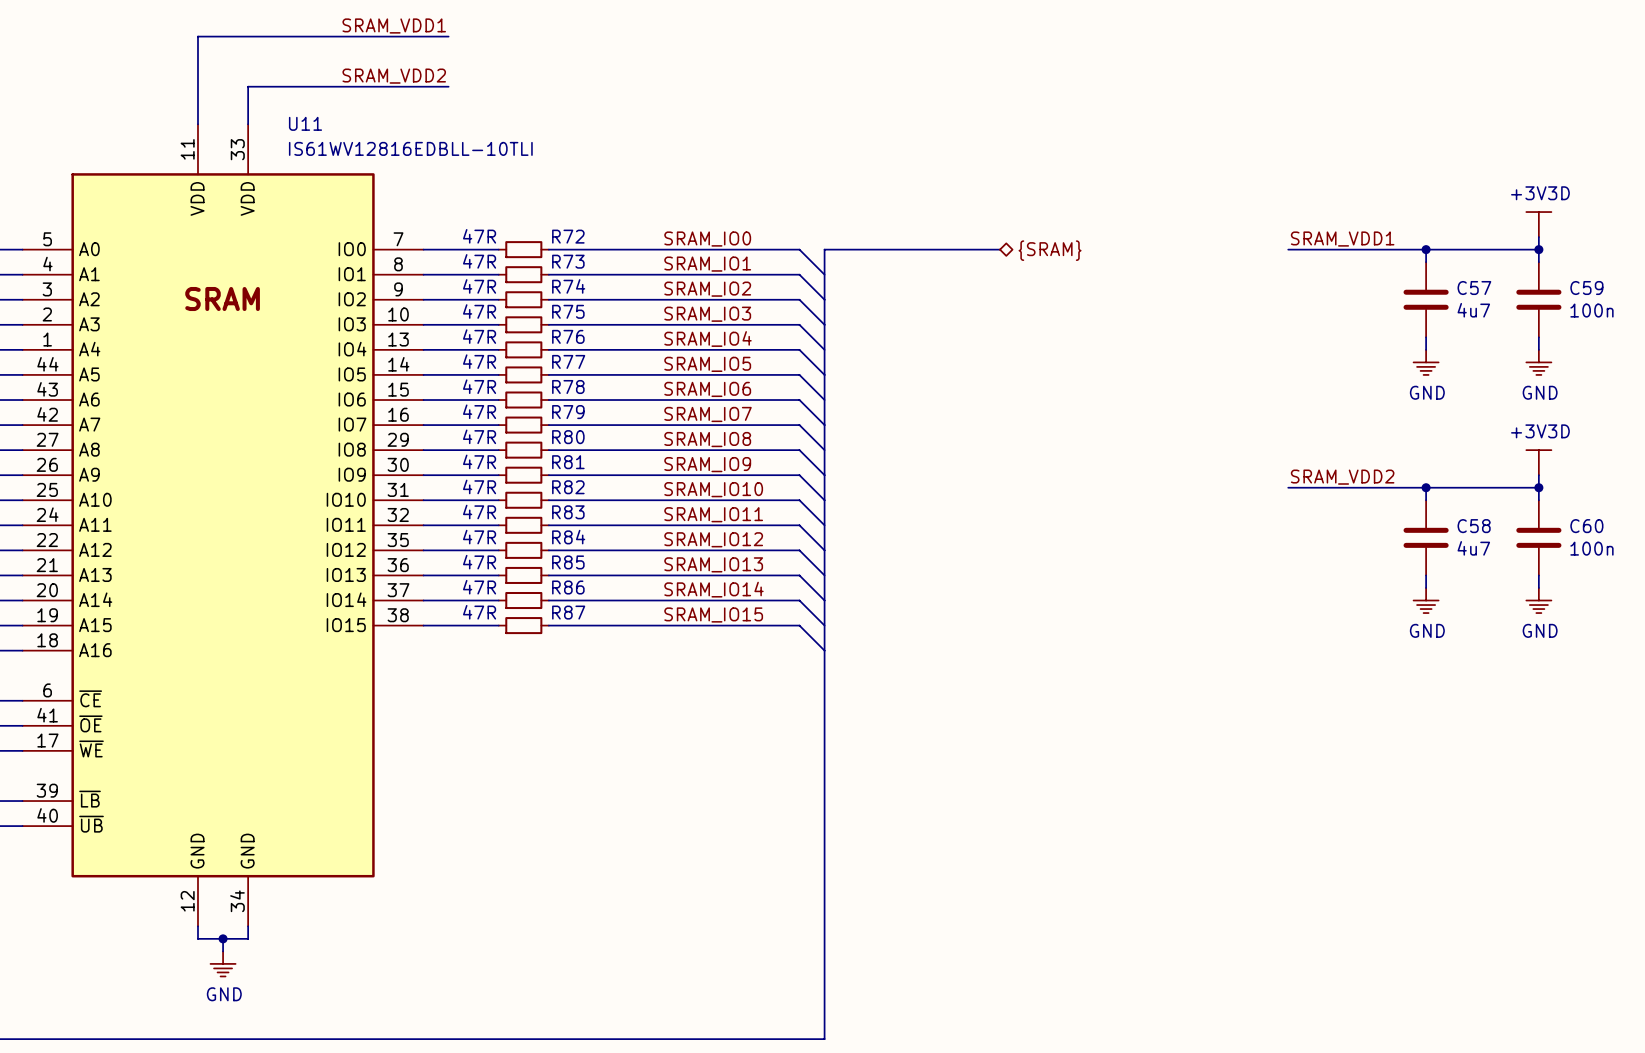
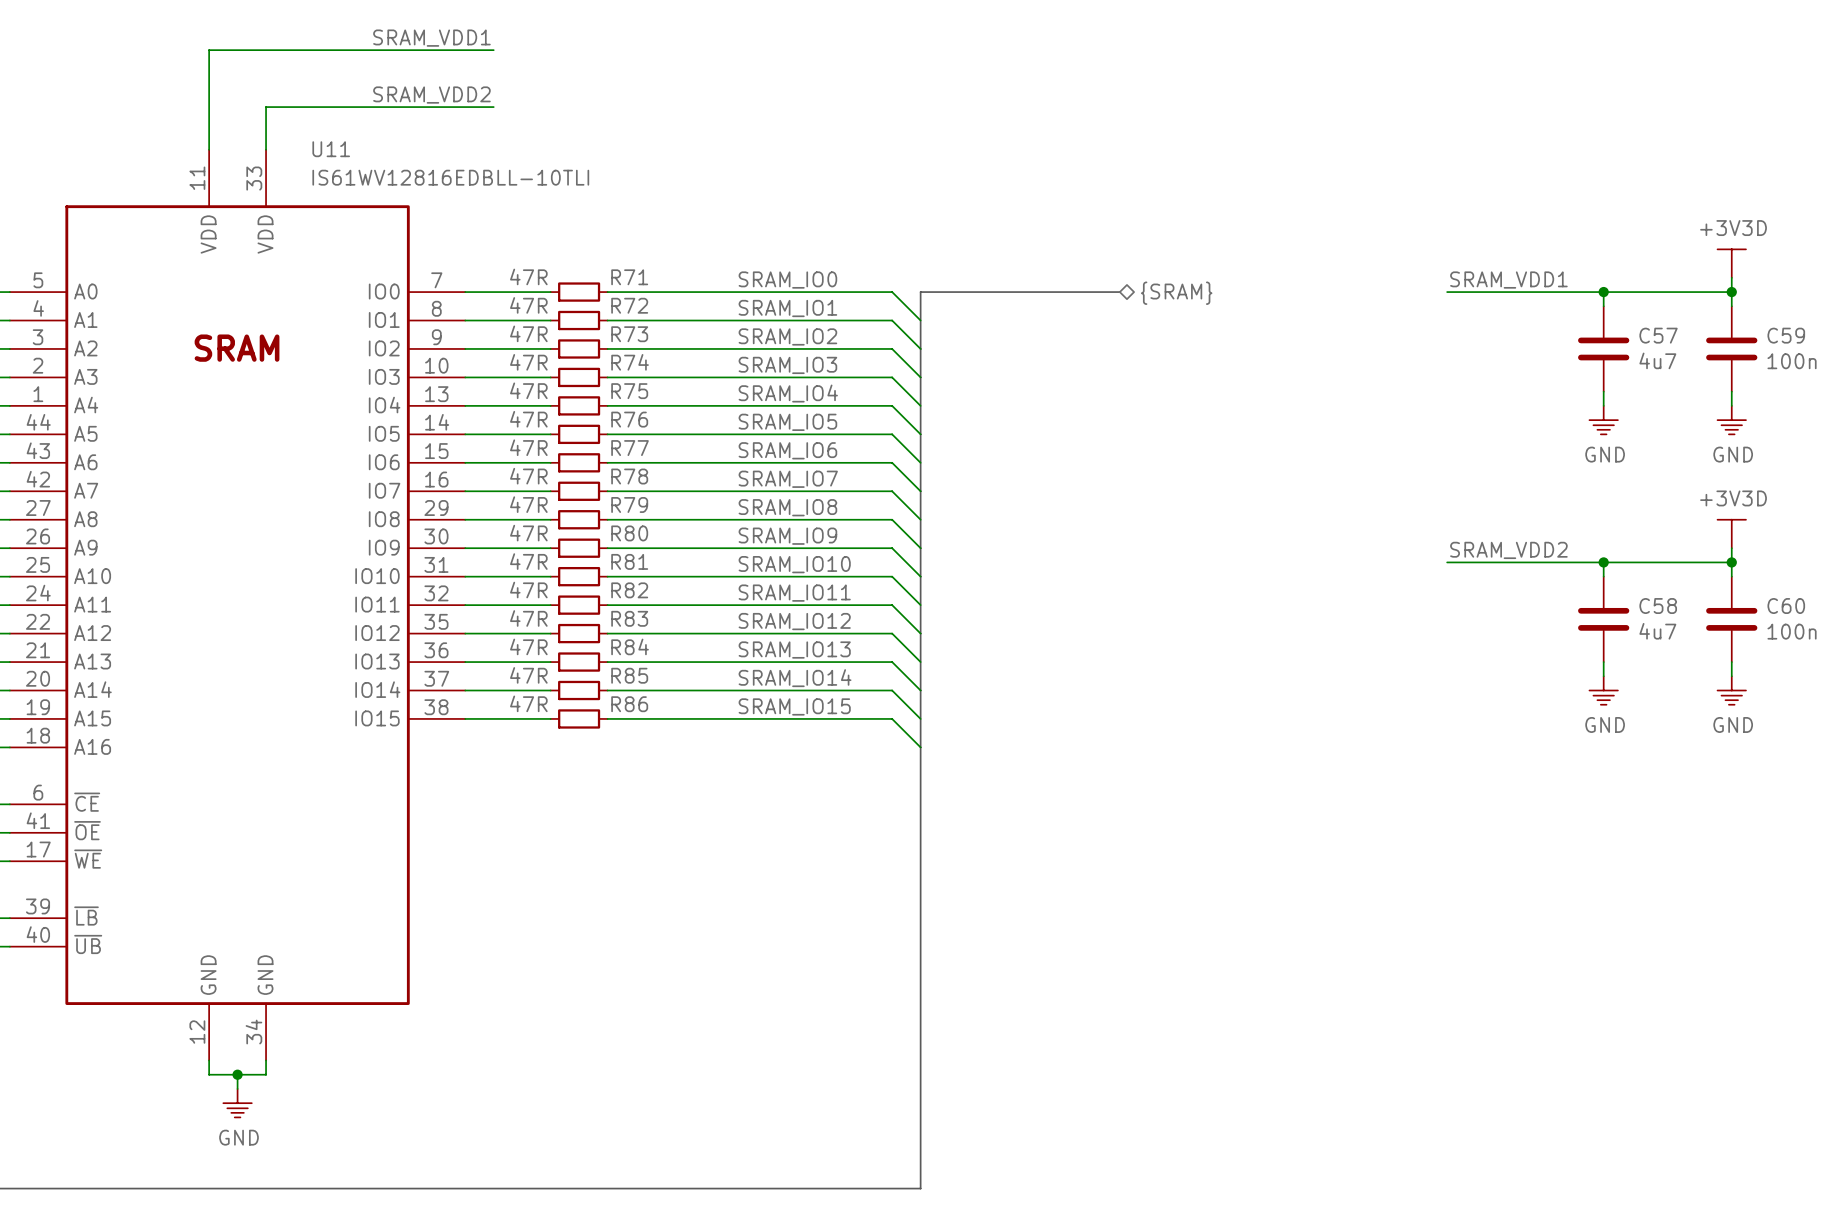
R72 name: R72 (568, 236) -> R71 (629, 277)
R73 name: R73 (568, 261) -> R72 (629, 305)
R74 name: R74 (568, 286) -> R73 (629, 334)
R75 name: R75 (568, 311) -> R74 (630, 362)
R76 name: R76 (568, 336) -> R75 (629, 391)
R77 name: R77 (568, 361) -> R76 (629, 419)
R78 name: R78 (568, 387) -> R77 (630, 448)
R79 name: R79 (568, 412) -> R78 (629, 476)
R80 name: R80 (568, 437) -> R79 (629, 504)
R81 name: R81 (568, 462) -> R80 (629, 533)
R82 name: R82 (568, 487) -> R81 (629, 561)
R83 name: R83 (568, 512) -> R82 (629, 590)
R84 name: R84 (568, 537) -> R83 (629, 618)
R85 name: R85 (568, 562) -> R84 (630, 646)
R86 name: R86 (568, 587) -> R85 (629, 675)
R87 name: R87 (568, 612) -> R86 (629, 704)

